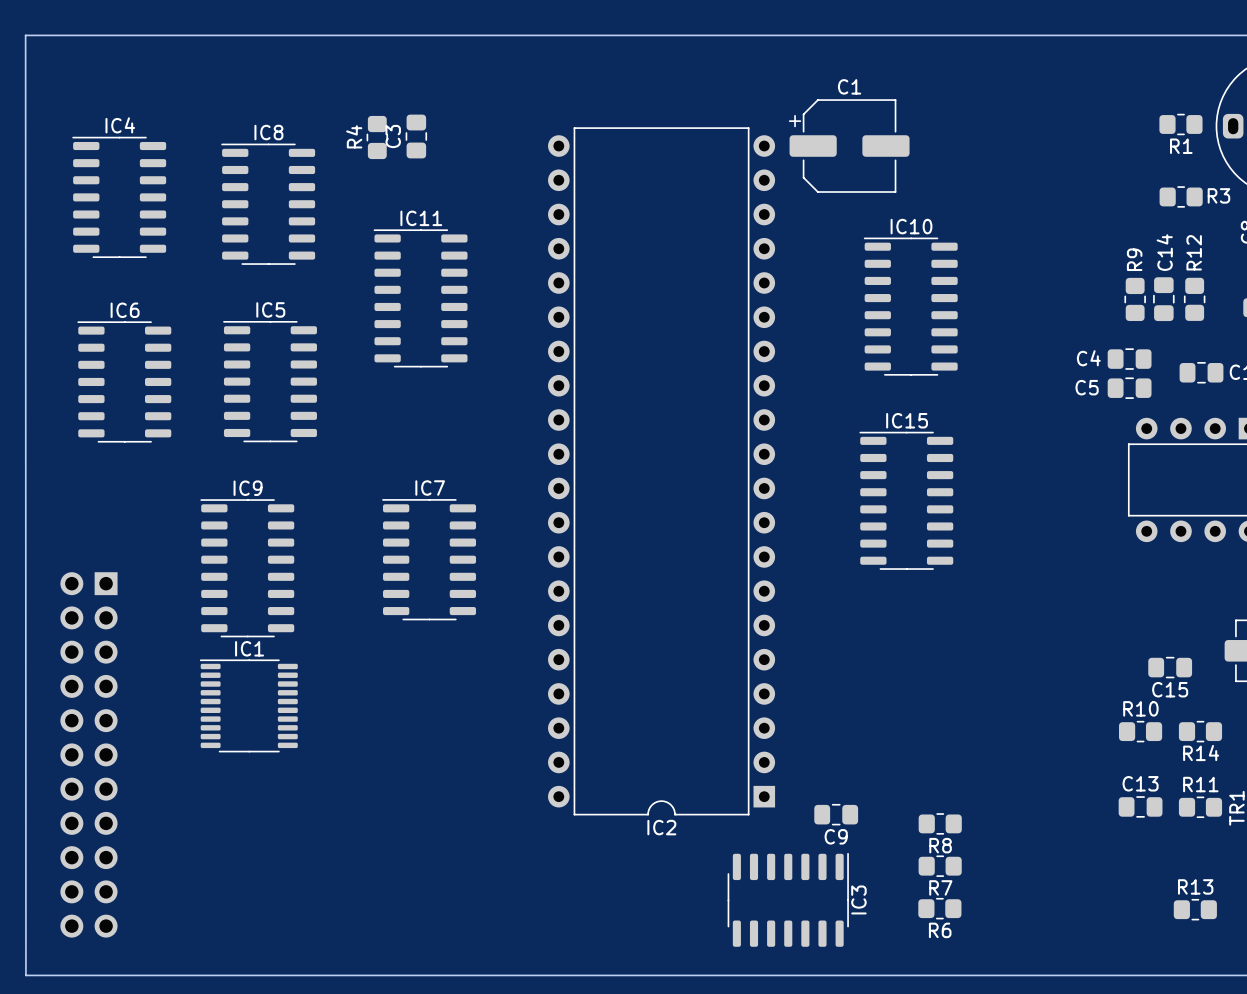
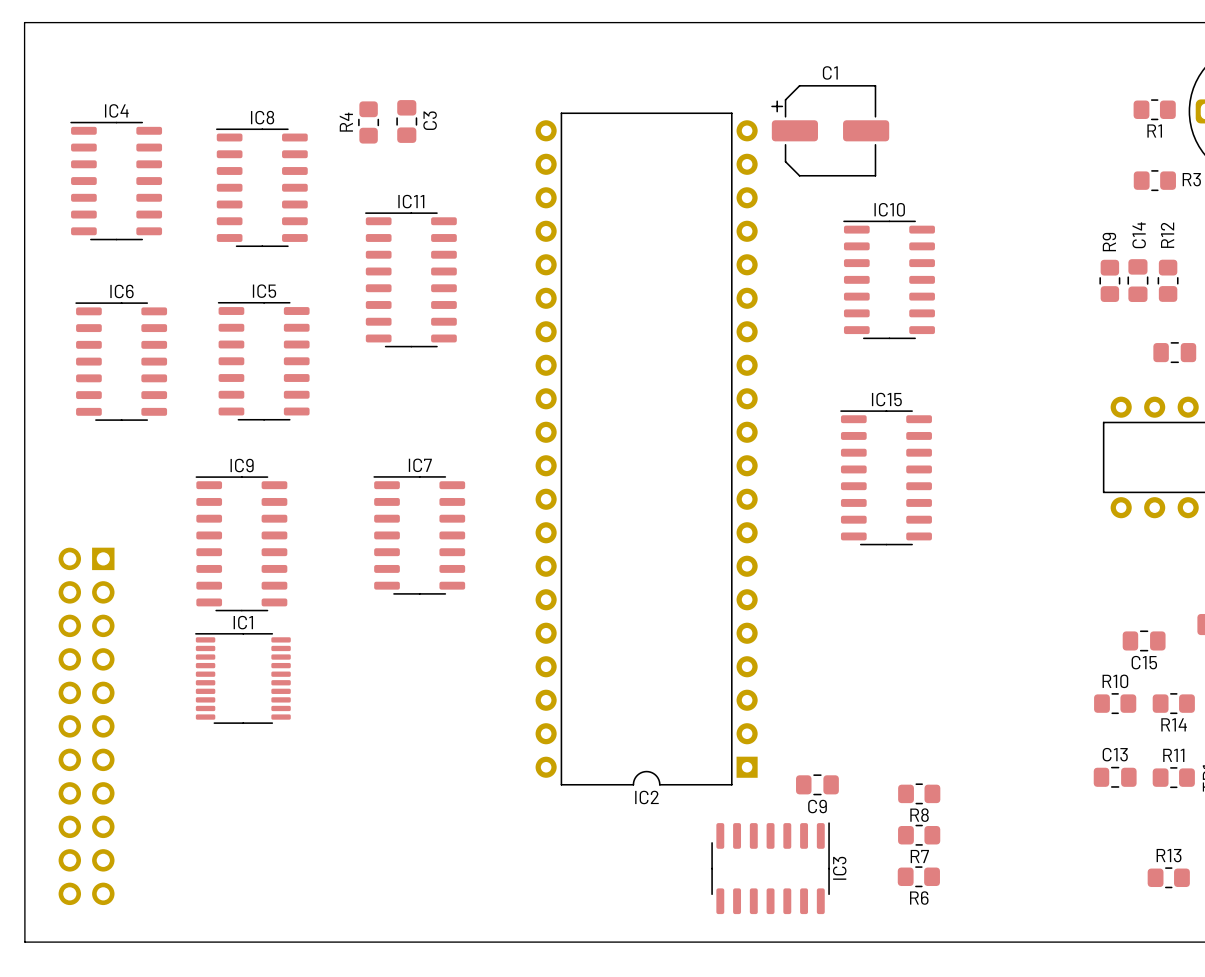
C3 name position: C3 (393, 136) -> C3 (430, 120)
IC10 footprint: [863, 237, 958, 376] -> [843, 220, 935, 340]
C4: (1129, 359) -> none
C5: (1129, 388) -> none

